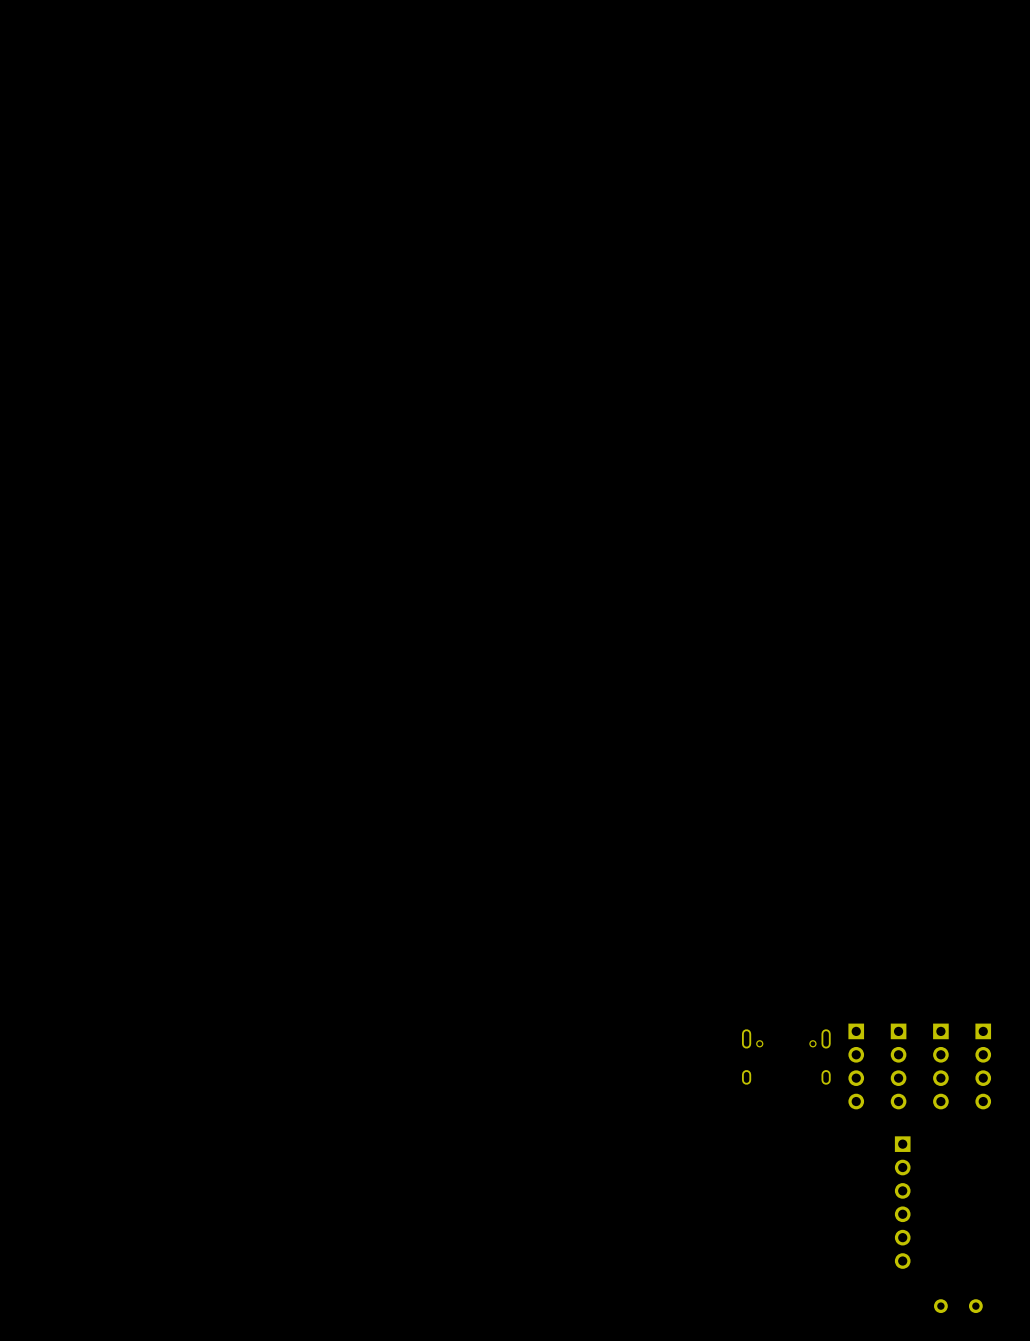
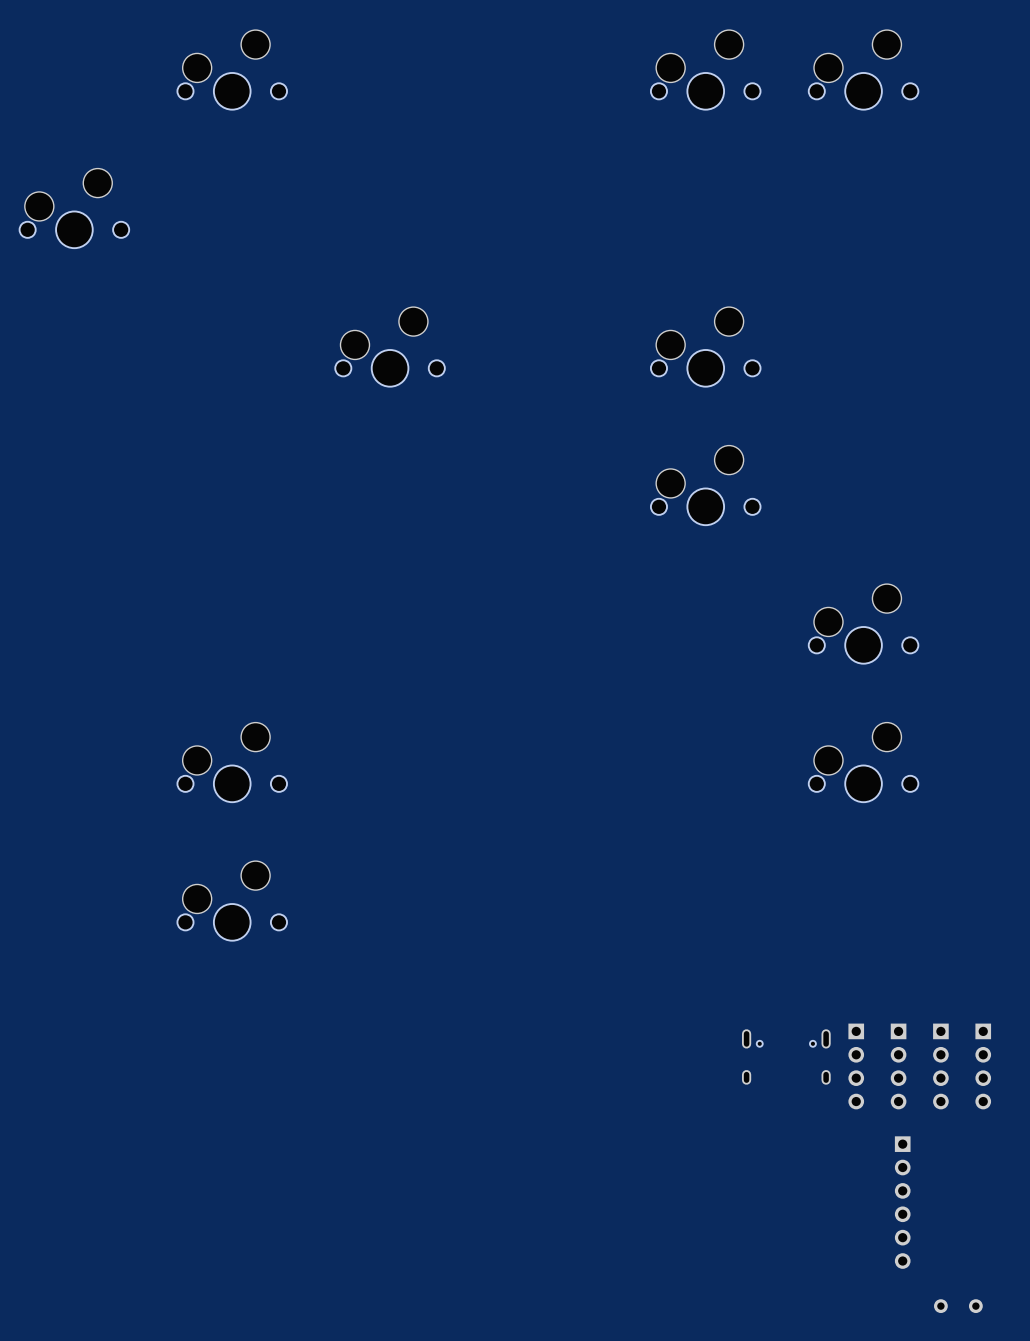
part: none -> (232, 69)
part: none -> (705, 69)
part: none -> (863, 69)
part: none -> (74, 208)
part: none -> (390, 346)
part: none -> (705, 346)
part: none -> (705, 485)
part: none -> (863, 623)
part: none -> (232, 762)
part: none -> (863, 762)
part: none -> (232, 900)

